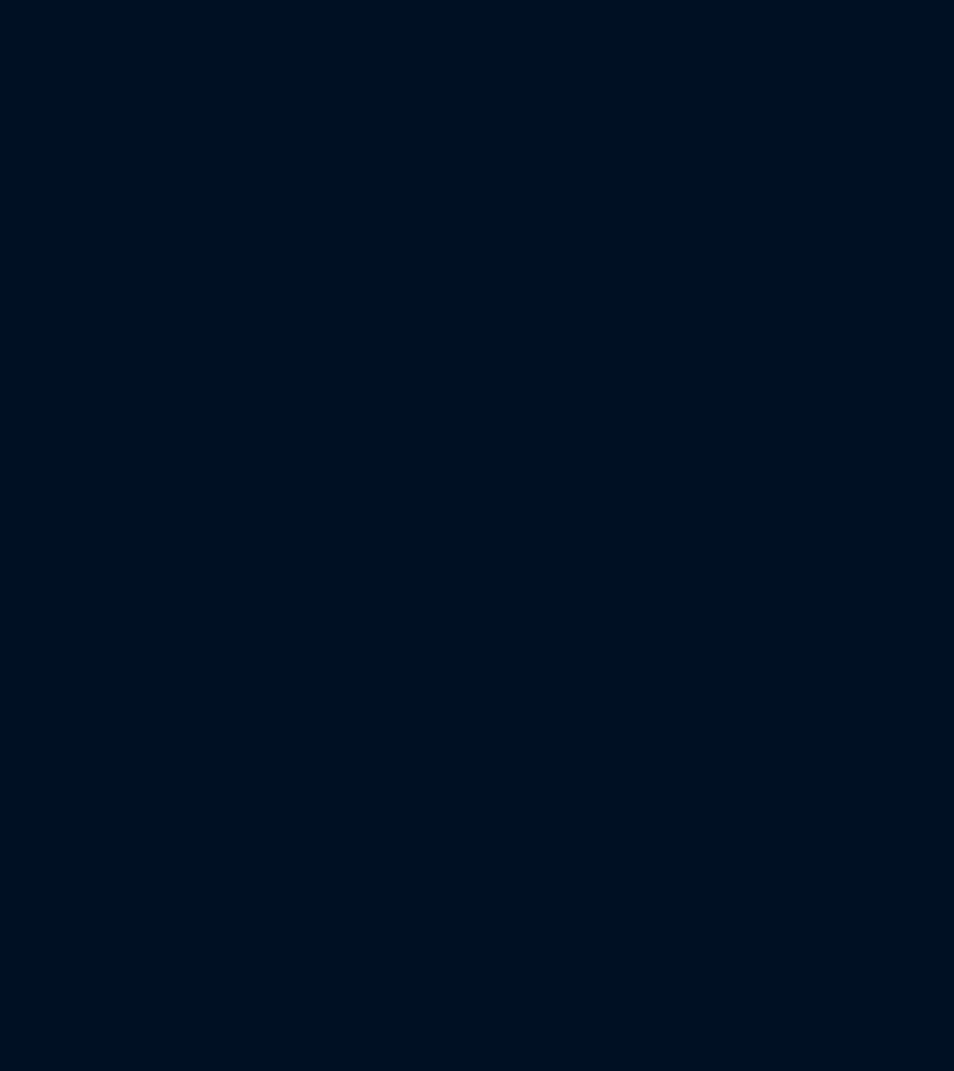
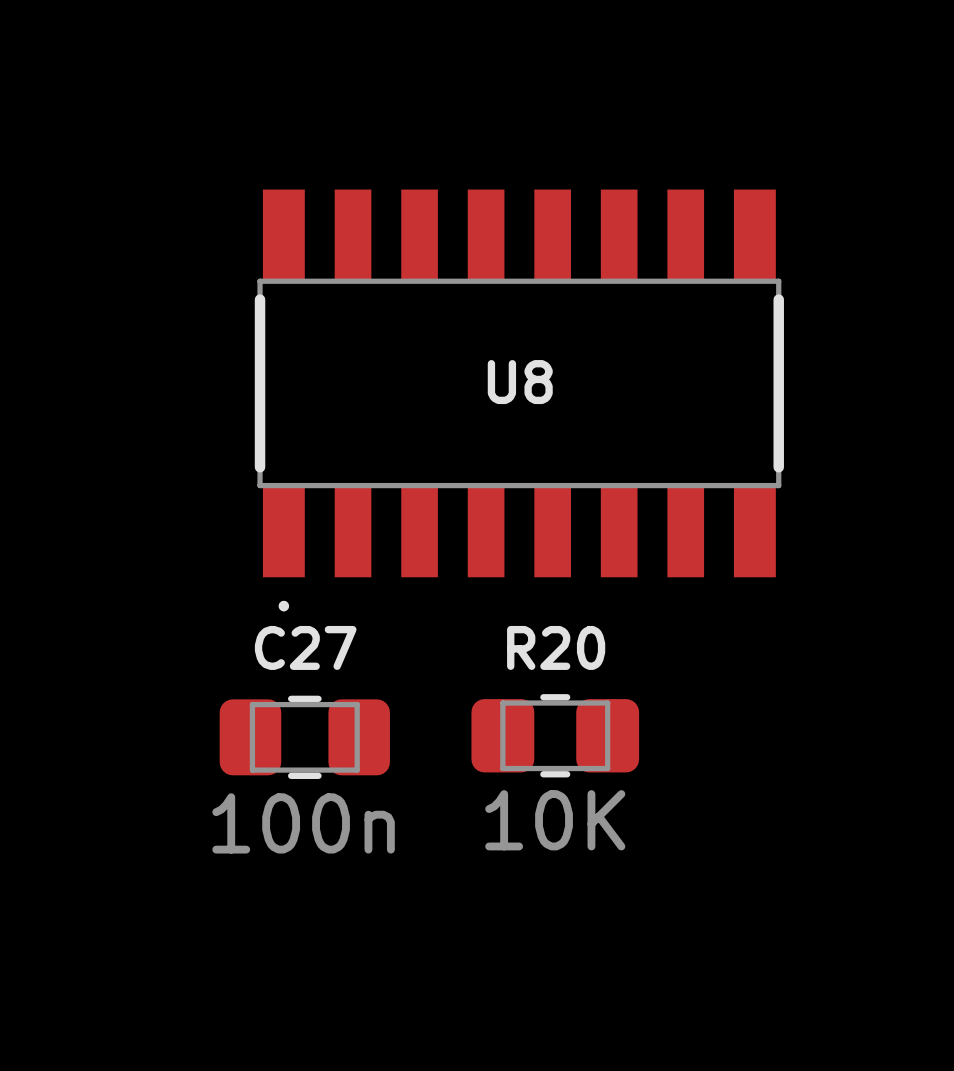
U8: none -> (519, 400)
R20: none -> 10K (555, 735)
C27: none -> 100n (304, 737)

